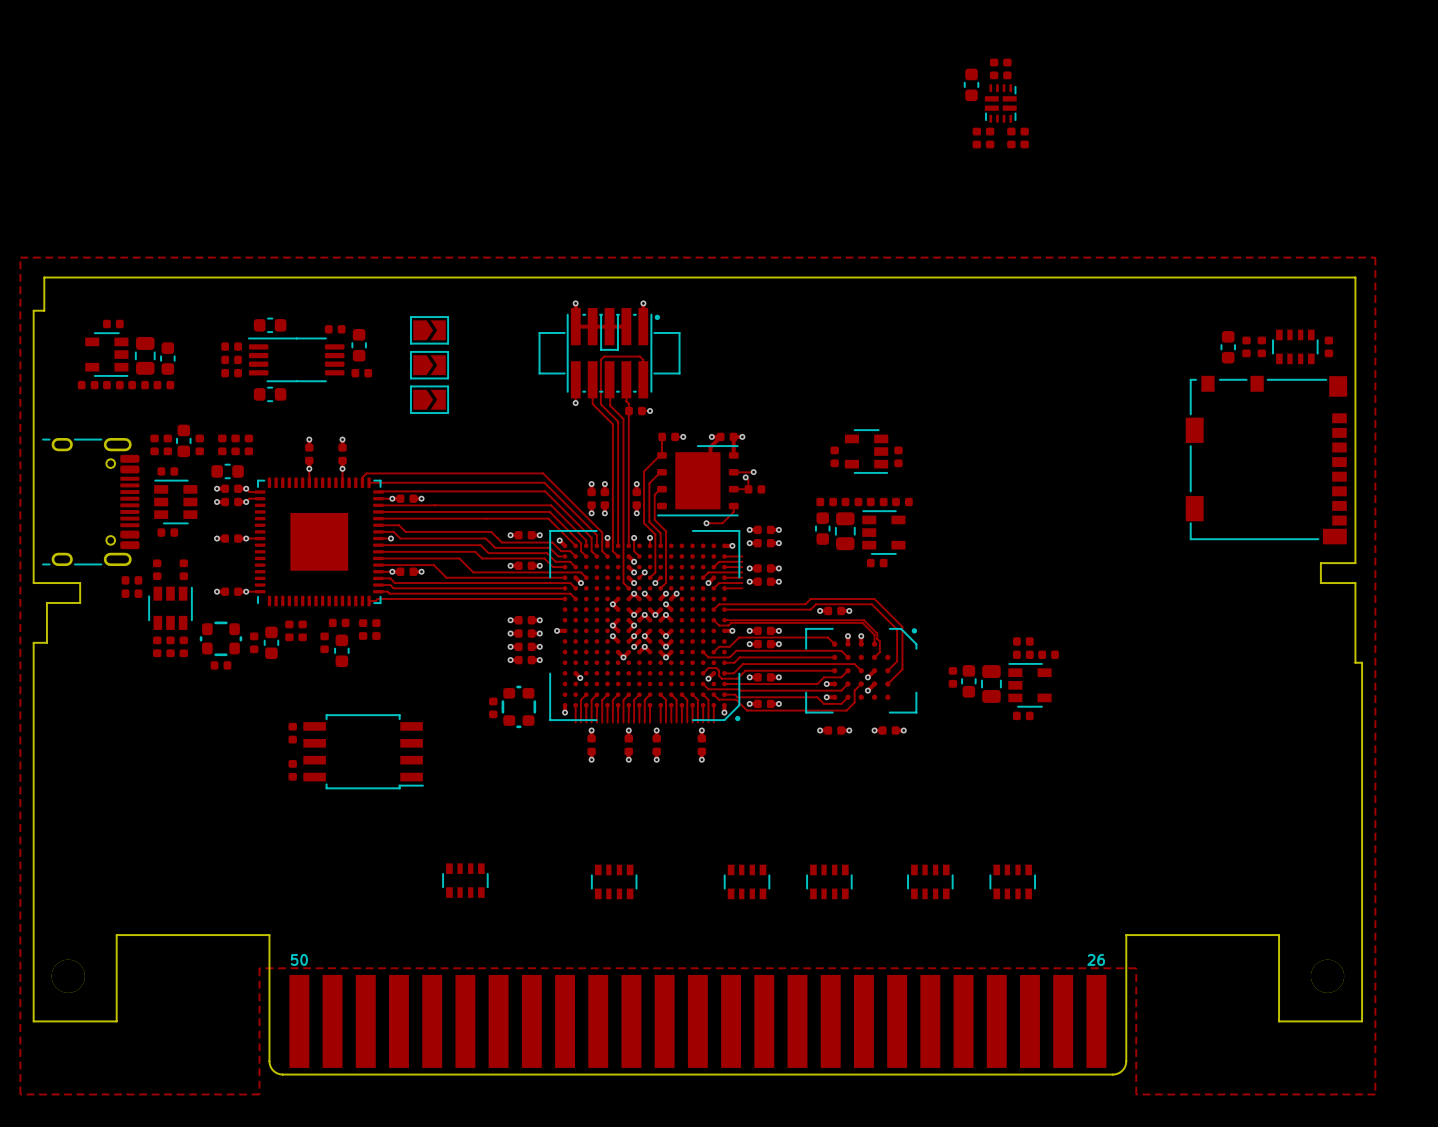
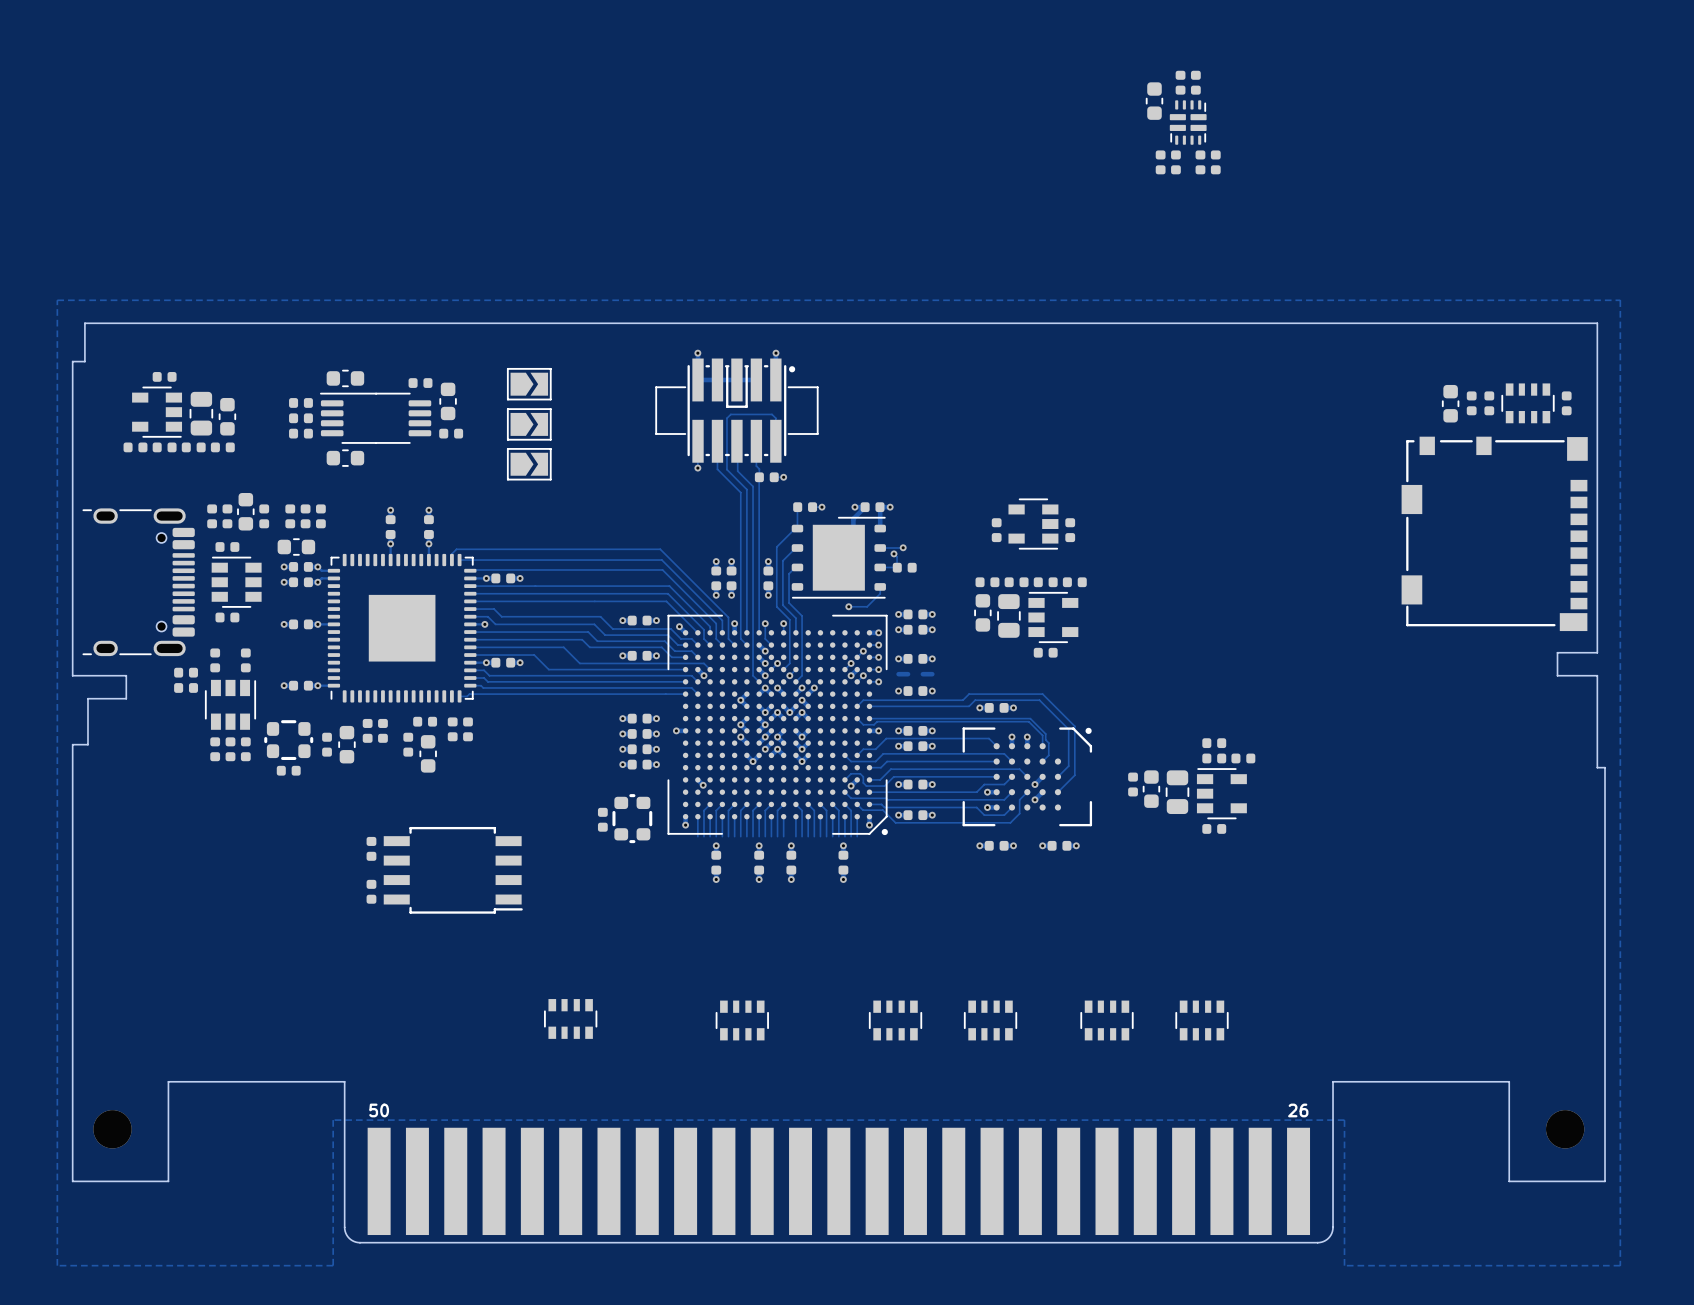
track: (732, 556) (742, 556) -> none
via: none -> (878, 645)
track: (719, 561) (742, 561) -> none
via: none -> (863, 651)
track: (732, 567) (742, 567) -> none
via: none -> (878, 657)
track: (708, 572) (742, 572) -> none
via: none -> (851, 663)
track: (732, 577) (742, 577) -> none
via: none -> (878, 669)
via: (749, 581) -> none
part position: (764, 581) -> (915, 691)
via position: (778, 581) -> (932, 691)
track: (719, 583) (742, 583) -> none
via: none -> (863, 675)
track: (732, 588) (742, 588) -> none
via: none -> (878, 681)
via: none -> (898, 691)

